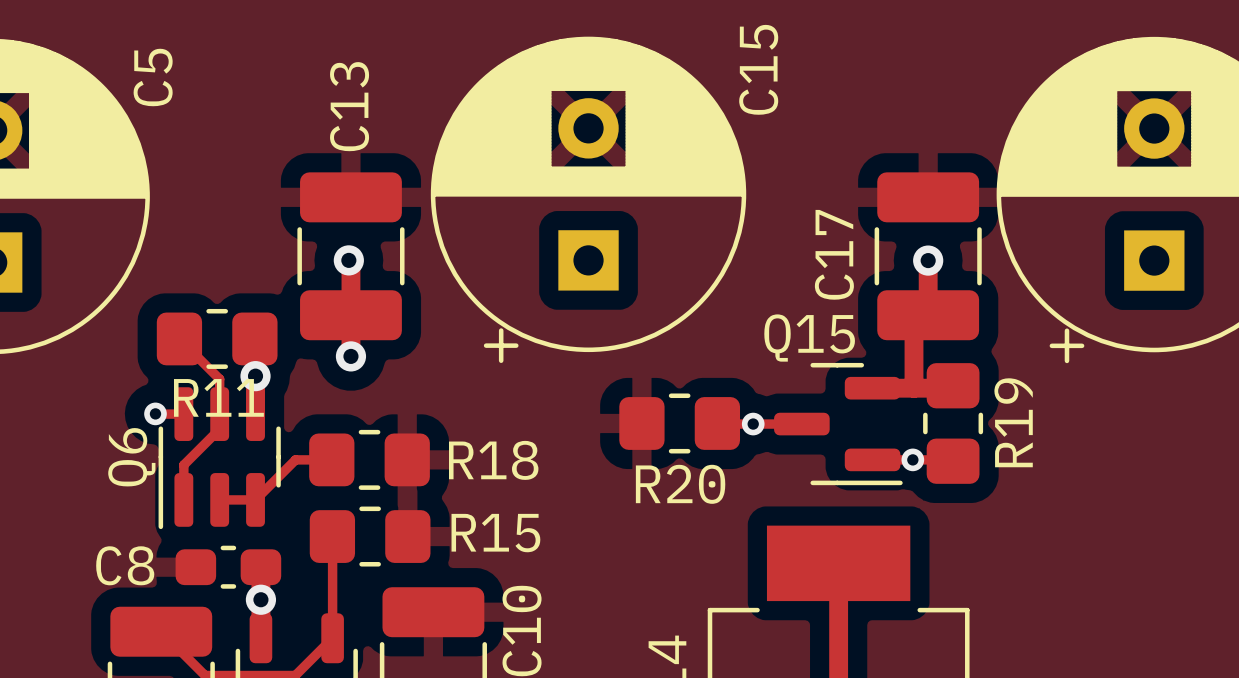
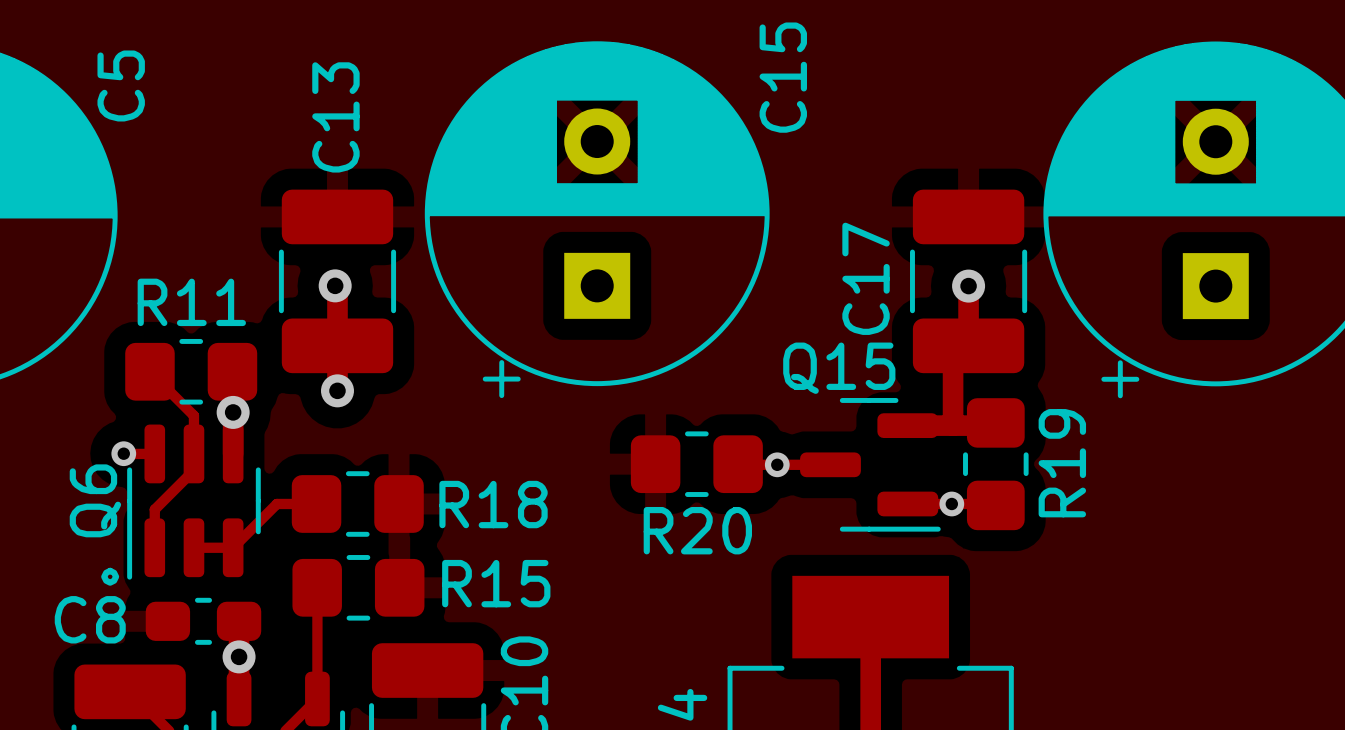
R11 name position: R11 (218, 397) -> R11 (191, 302)
text: none -> ° (110, 576)

